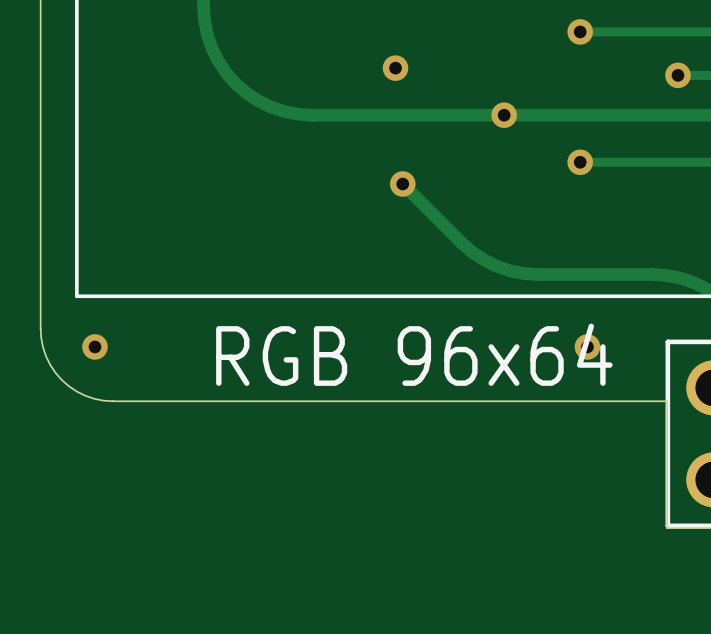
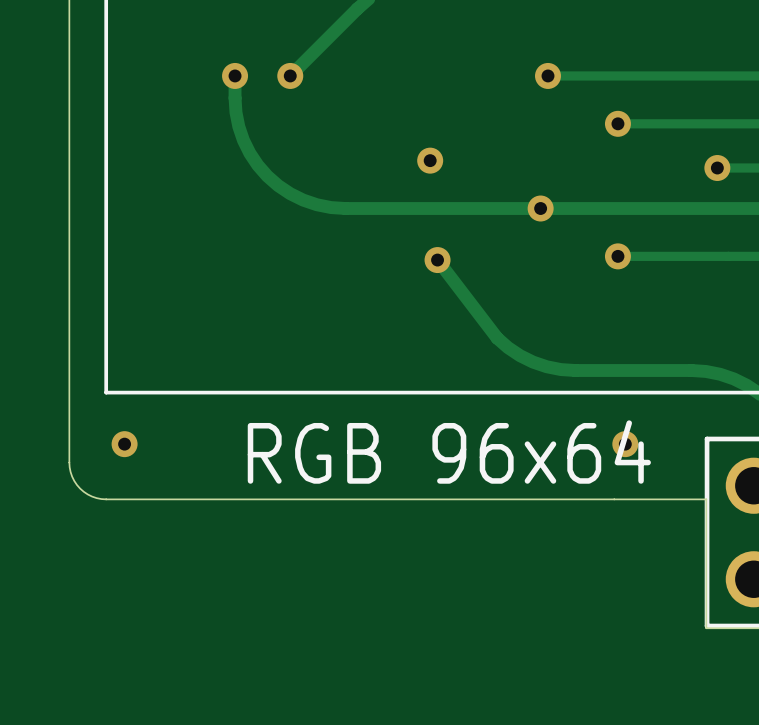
track: (402, 184) (461, 242) -> (437, 260) (497, 338)
via position: (402, 184) -> (437, 260)
board edge: (40, 328) (46, 356) (61, 380) (85, 395) (113, 401) -> (69, 425) (69, 467) (72, 476) (80, 488) (92, 496) (101, 499) (142, 499)

